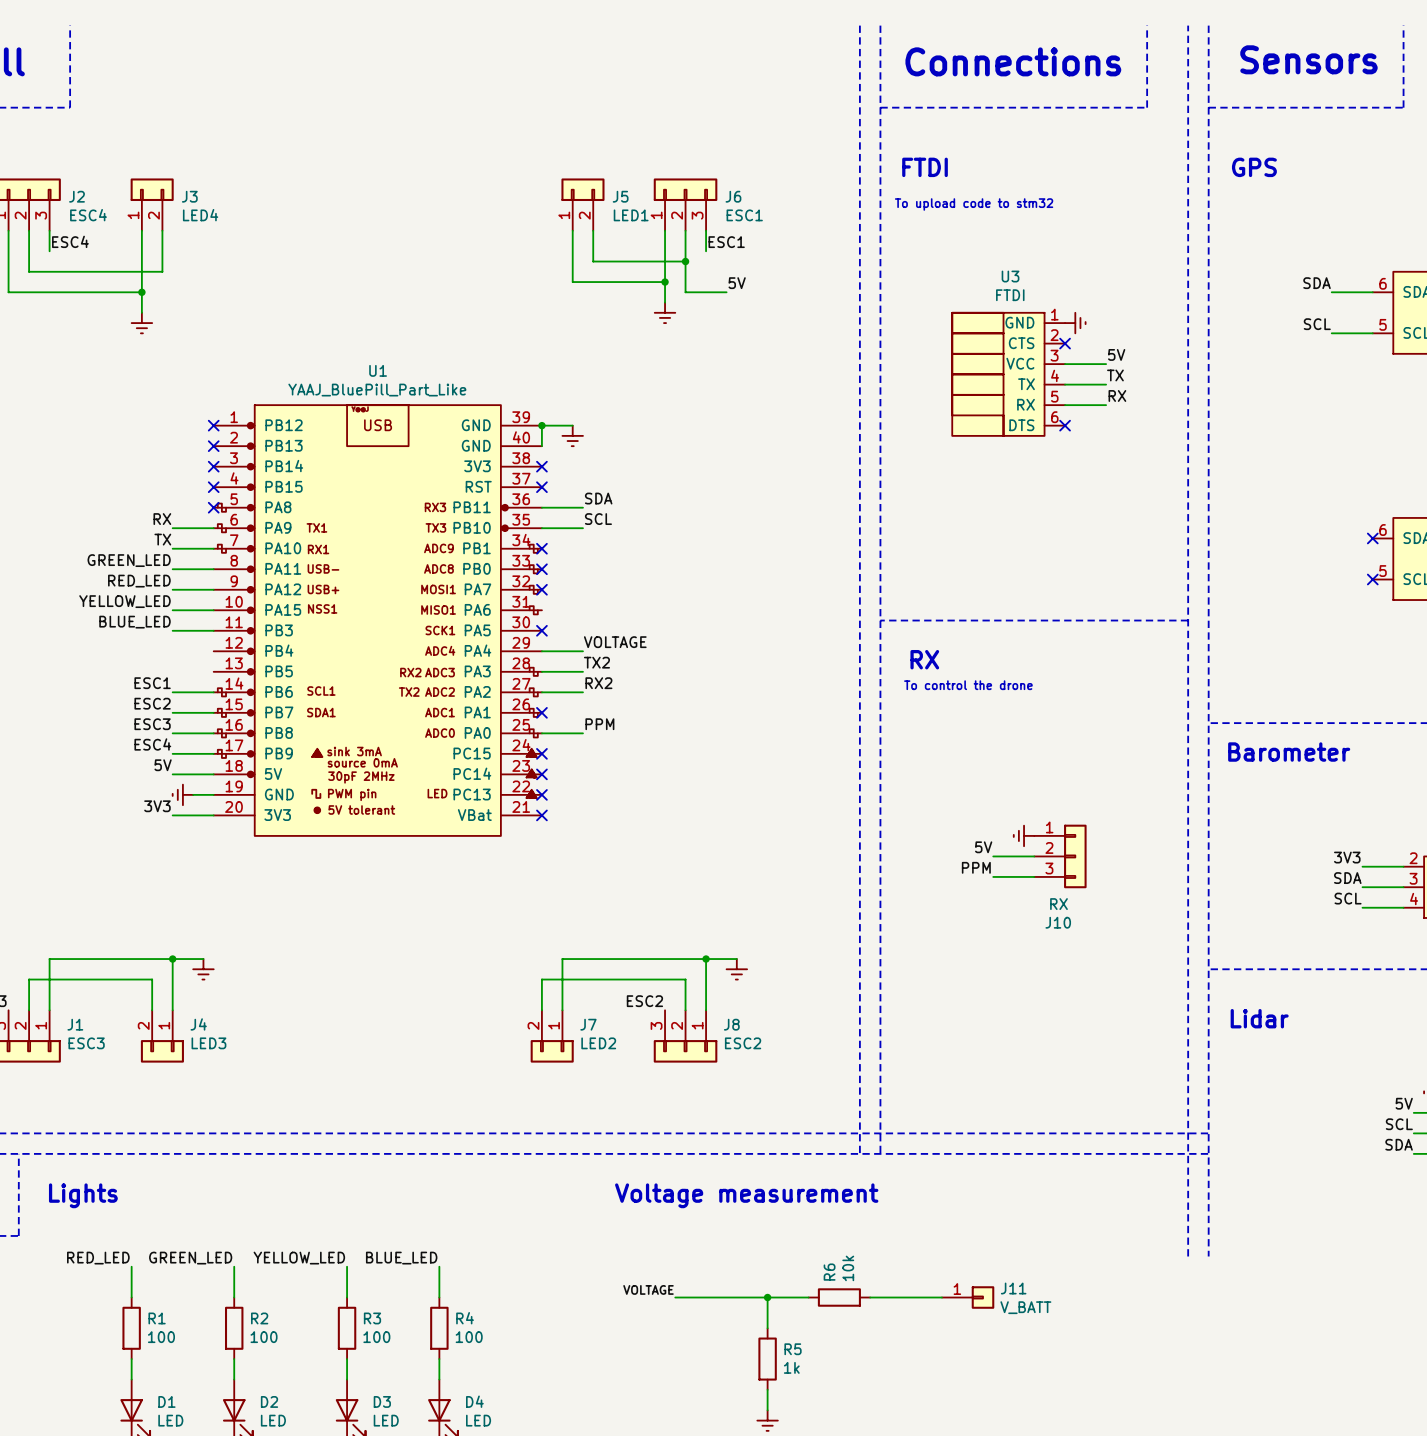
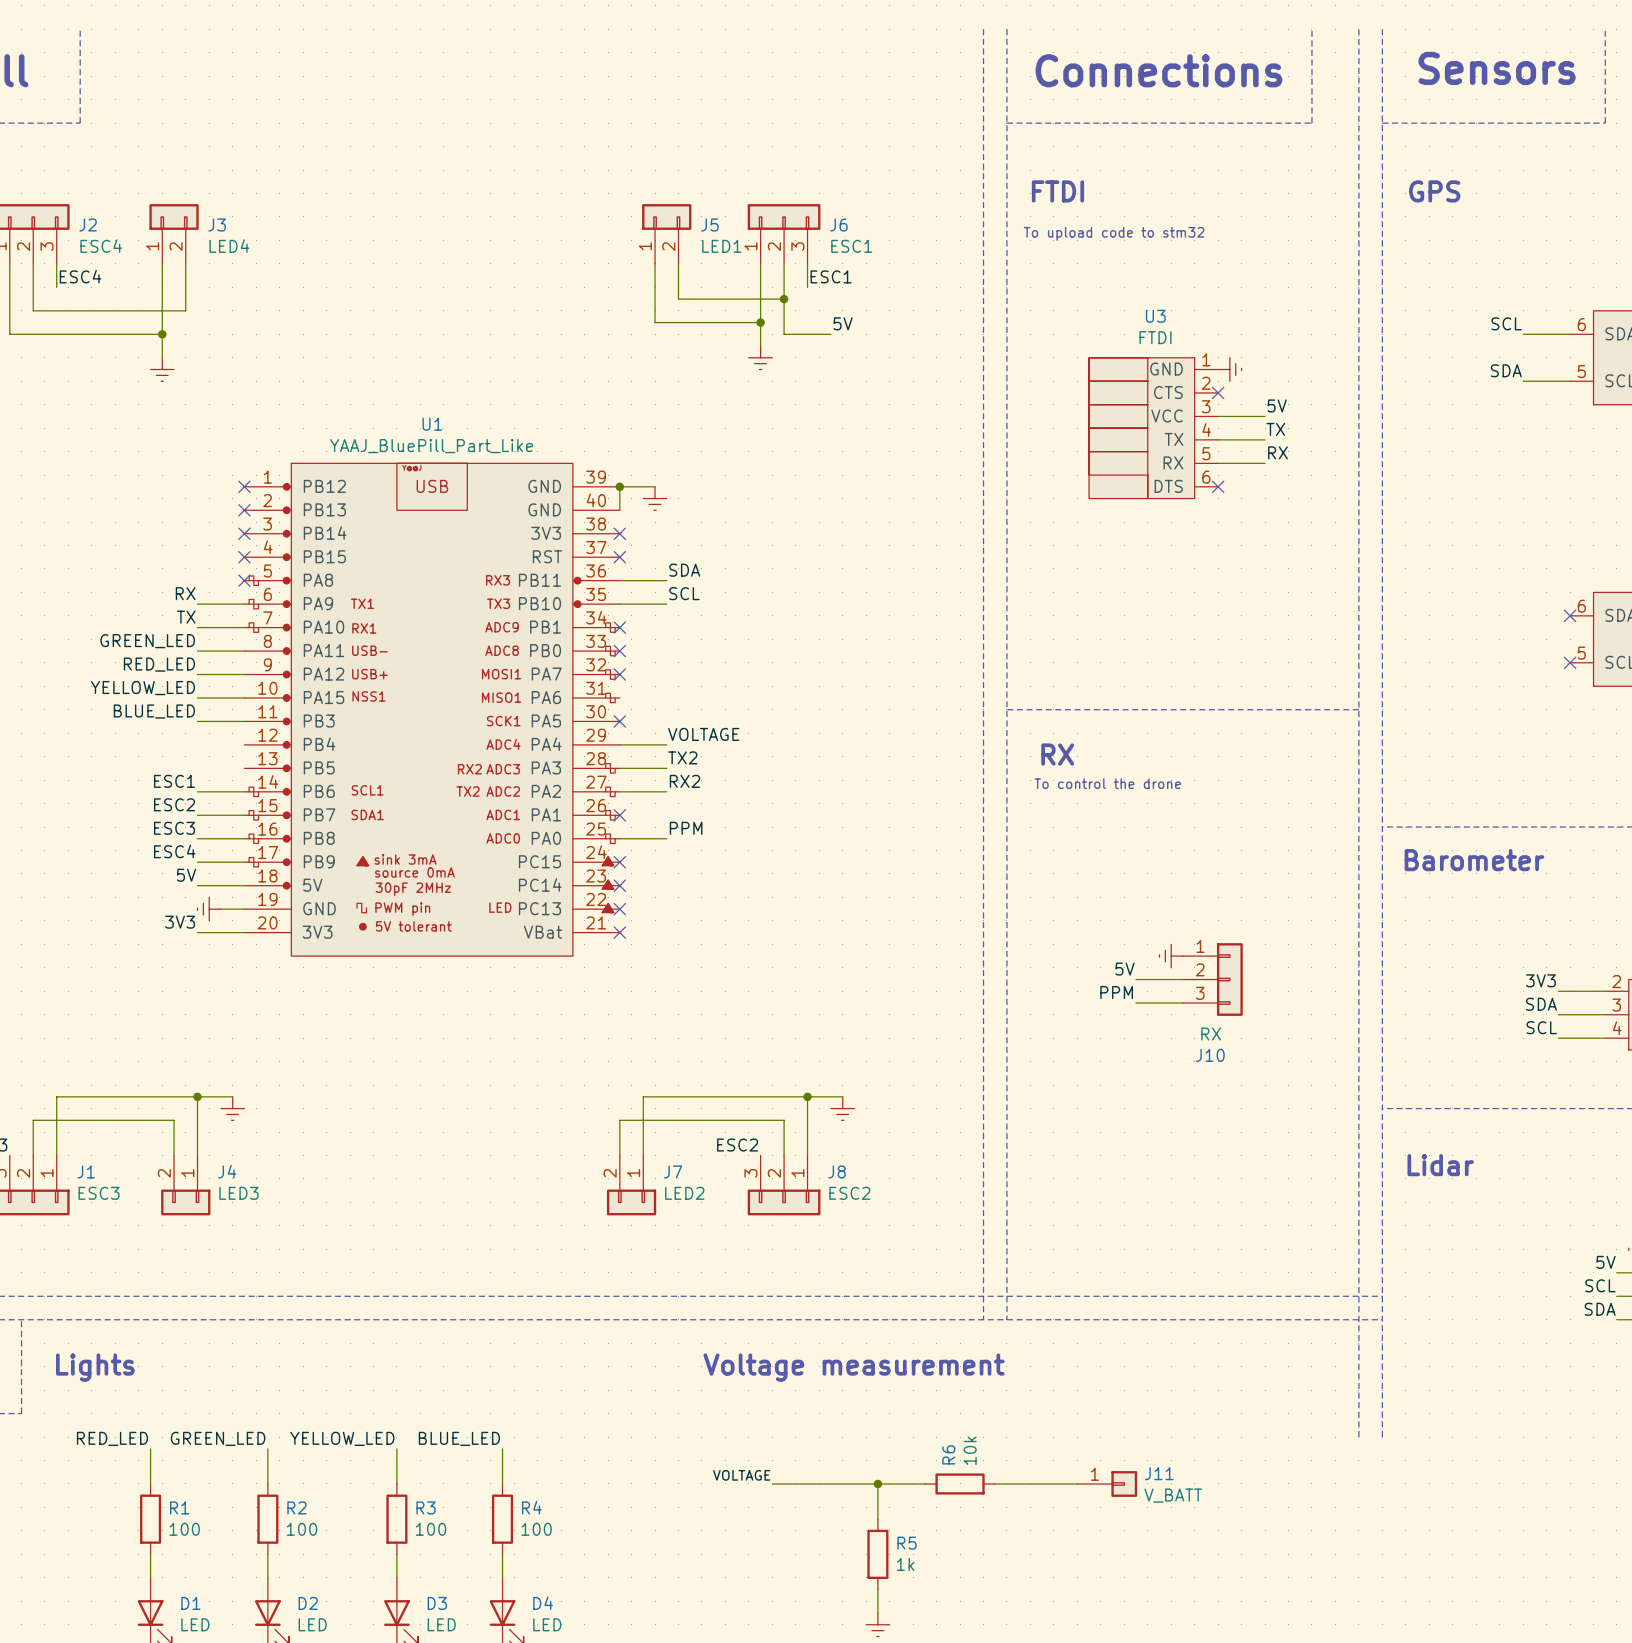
label: SDA (1317, 283) -> SCL (1506, 323)
label: SCL (1317, 324) -> SDA (1506, 370)

